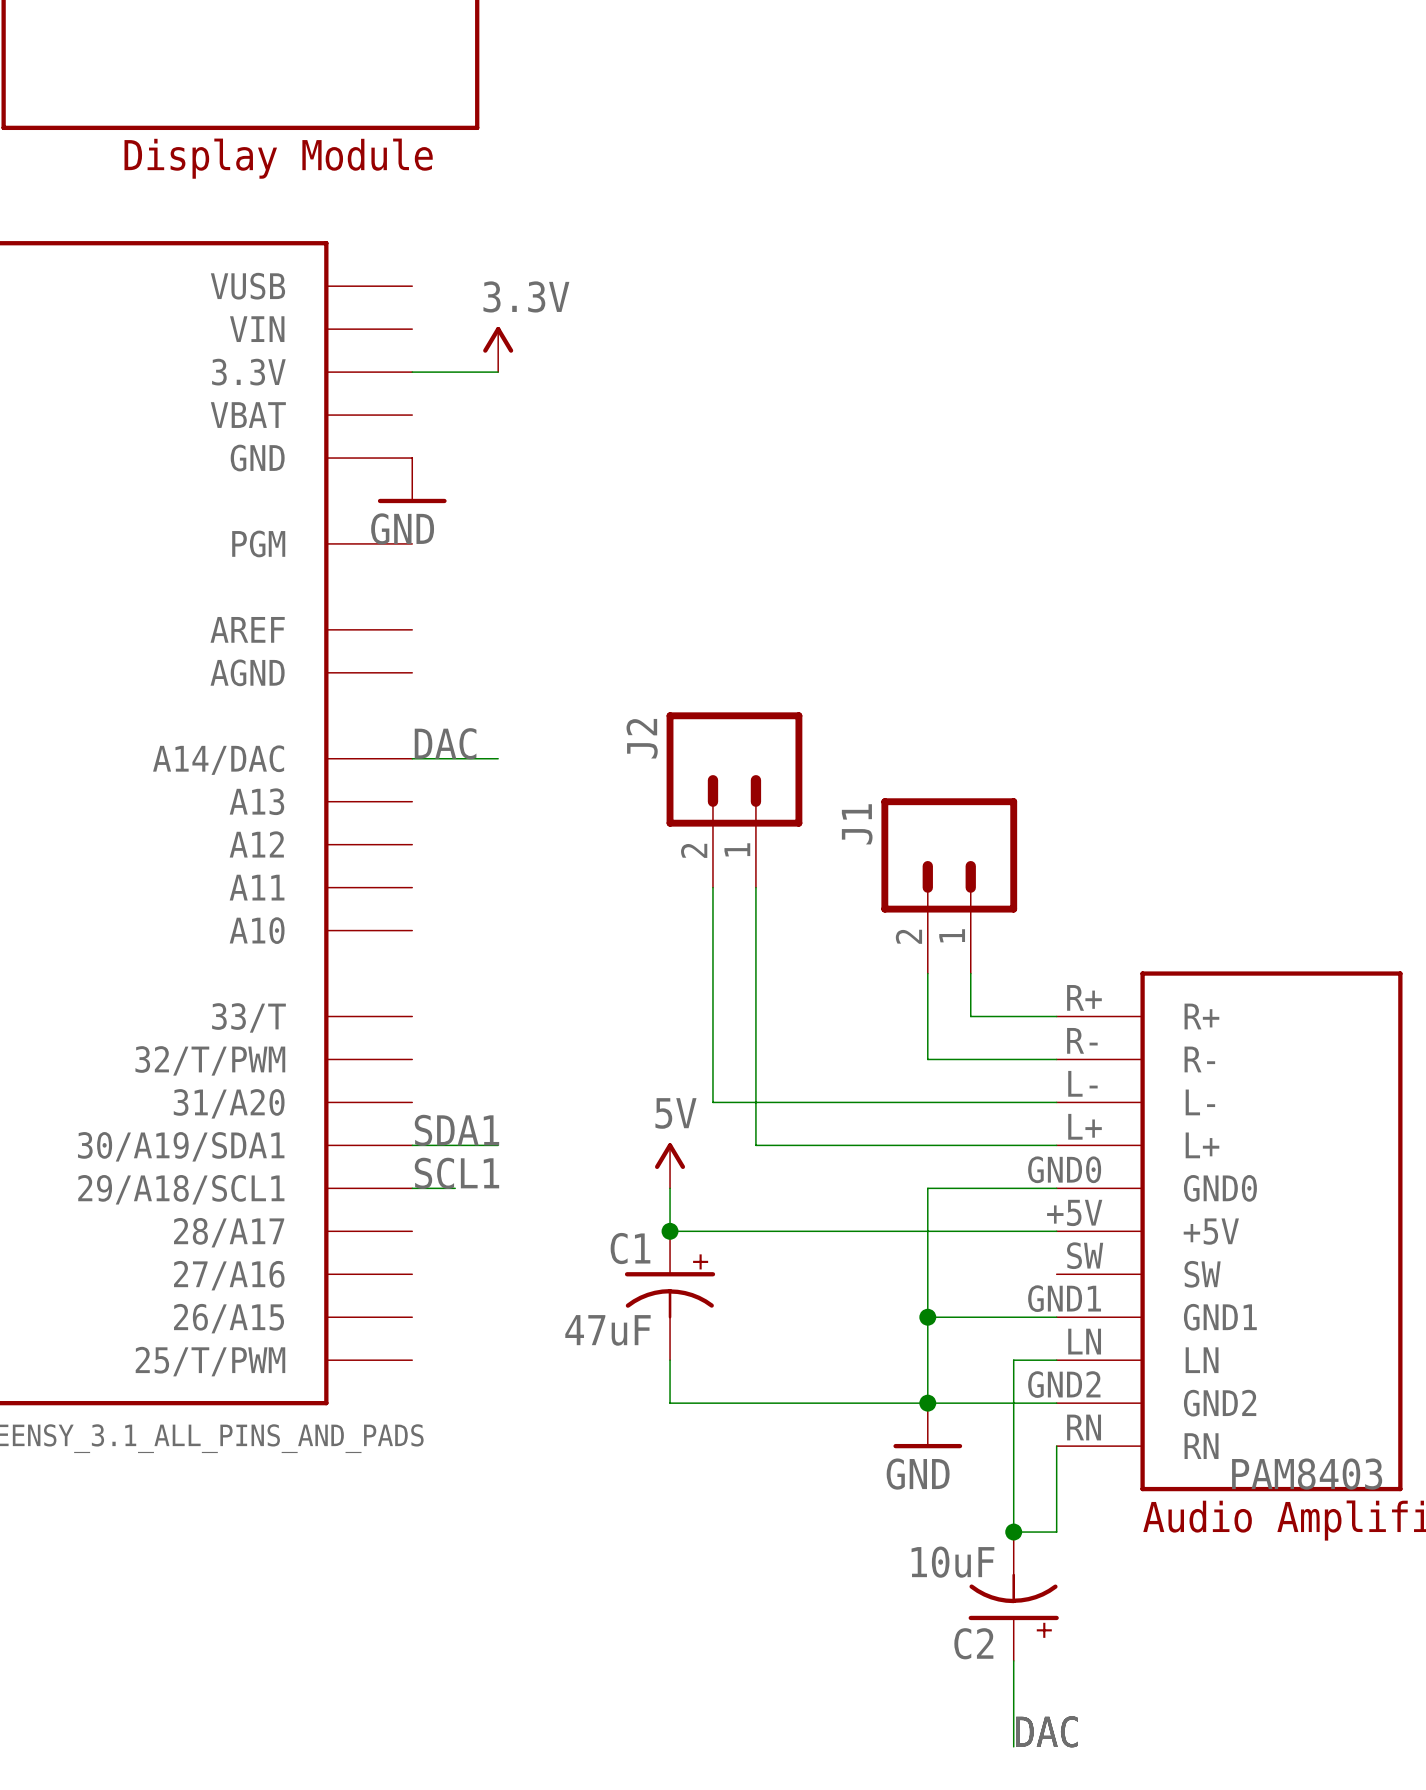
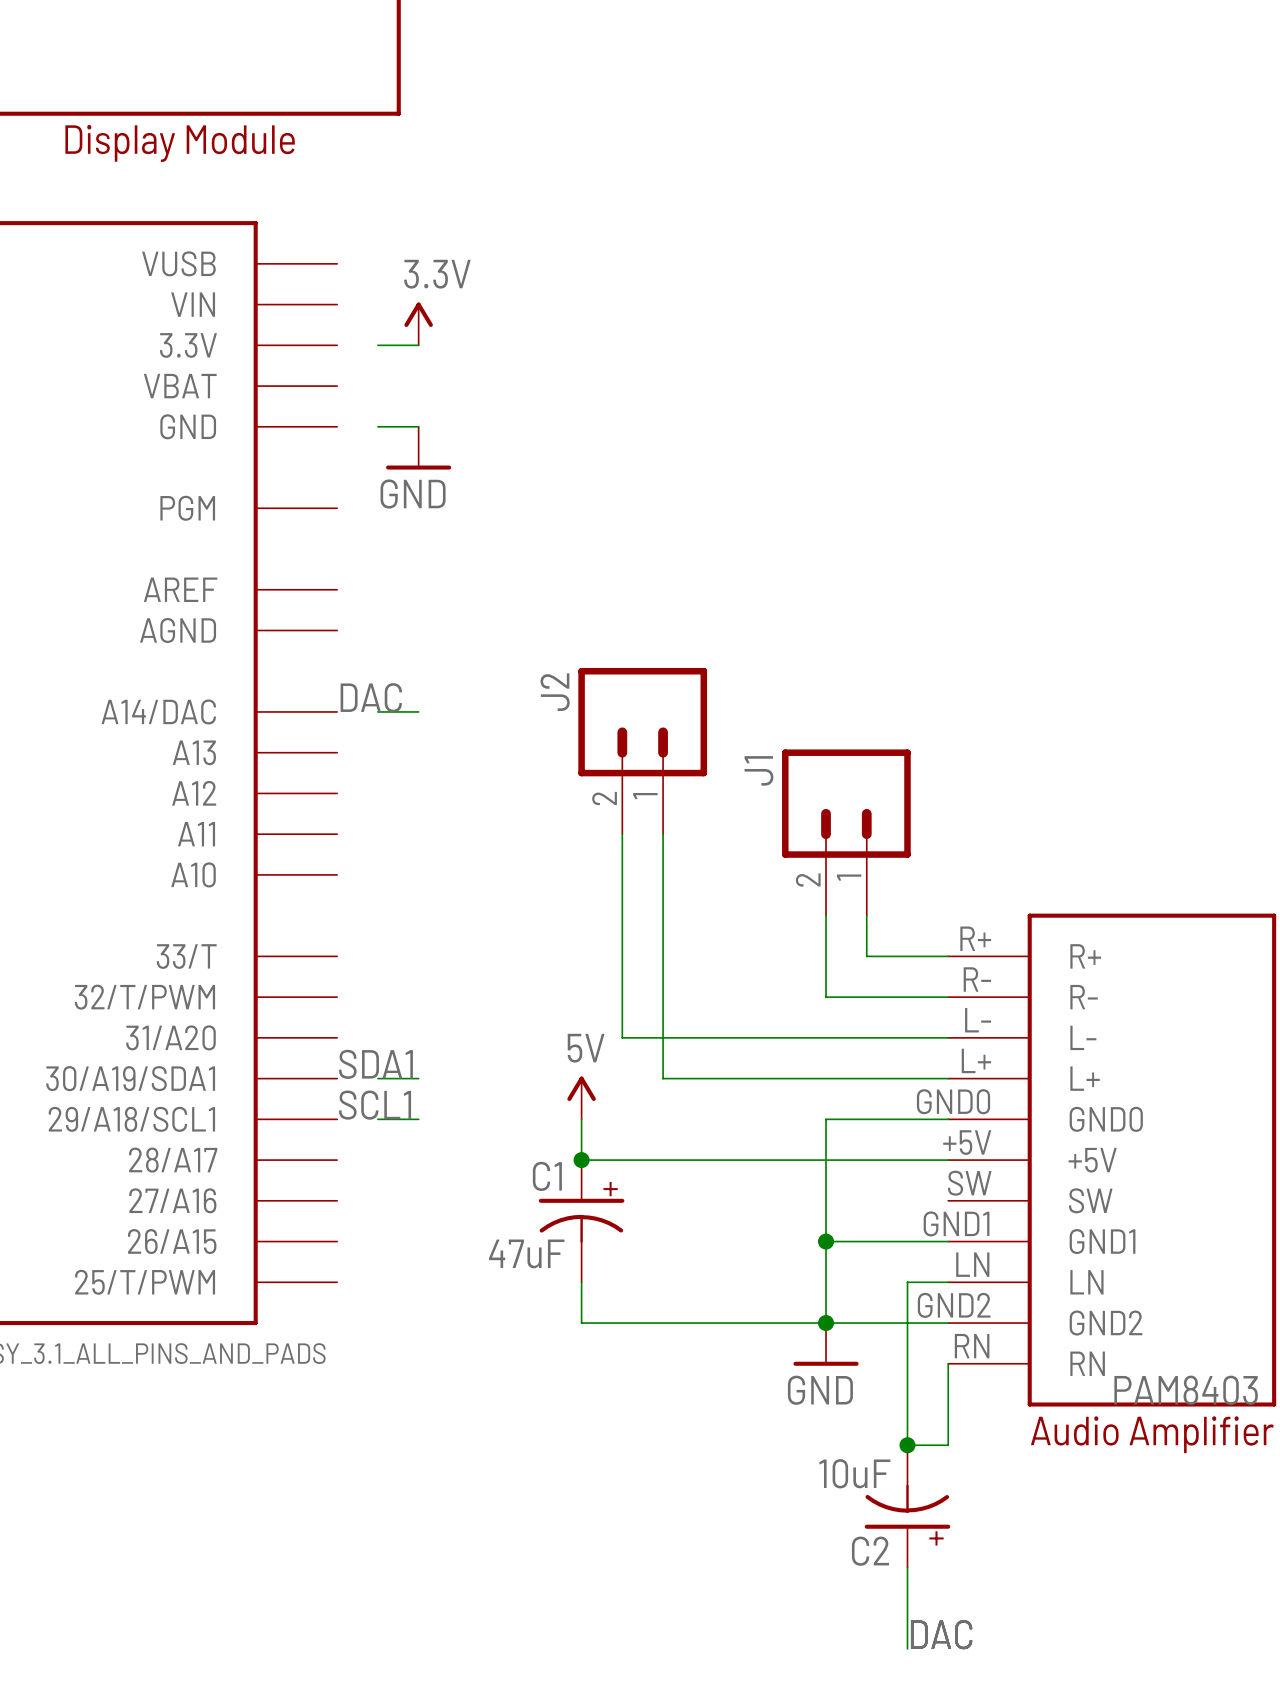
wire: (412, 372) (455, 372) -> (377, 426) (418, 426)
power symbol position: GND (412, 480) -> GND (418, 448)
wire: (412, 758) (455, 758) -> none
wire: (412, 1145) (455, 1145) -> none
wire: (412, 1188) (455, 1188) -> (418, 1119) (377, 1119)

